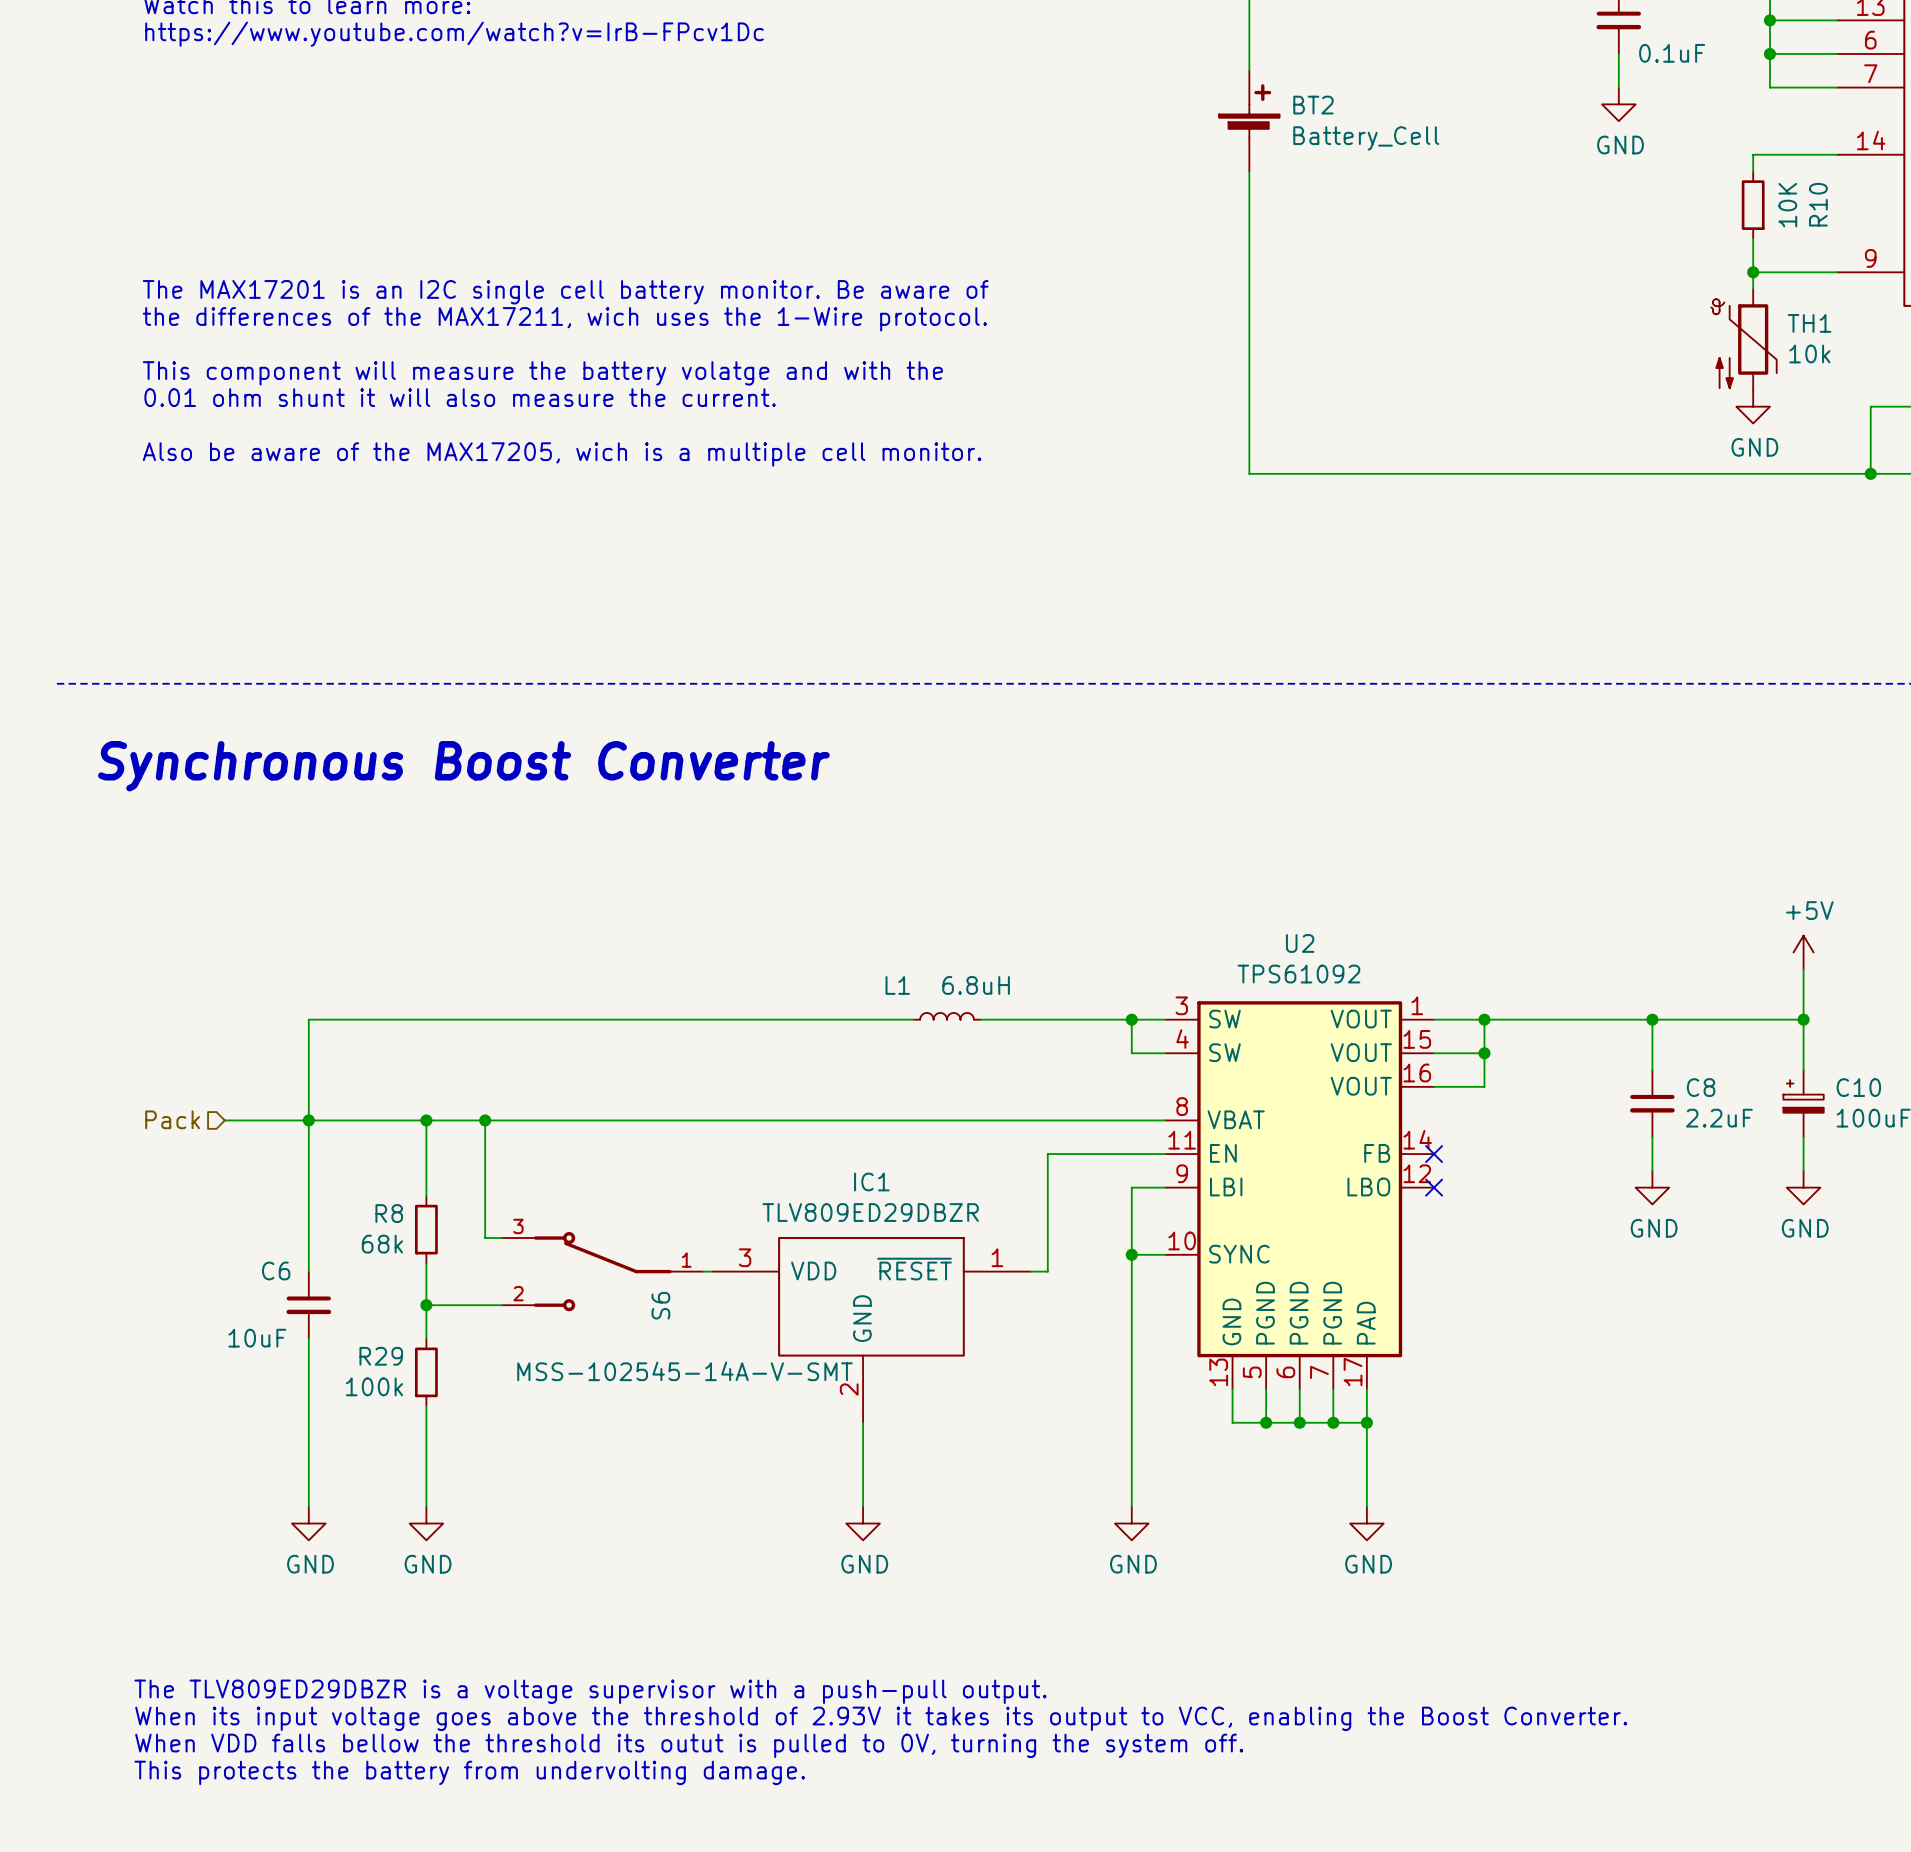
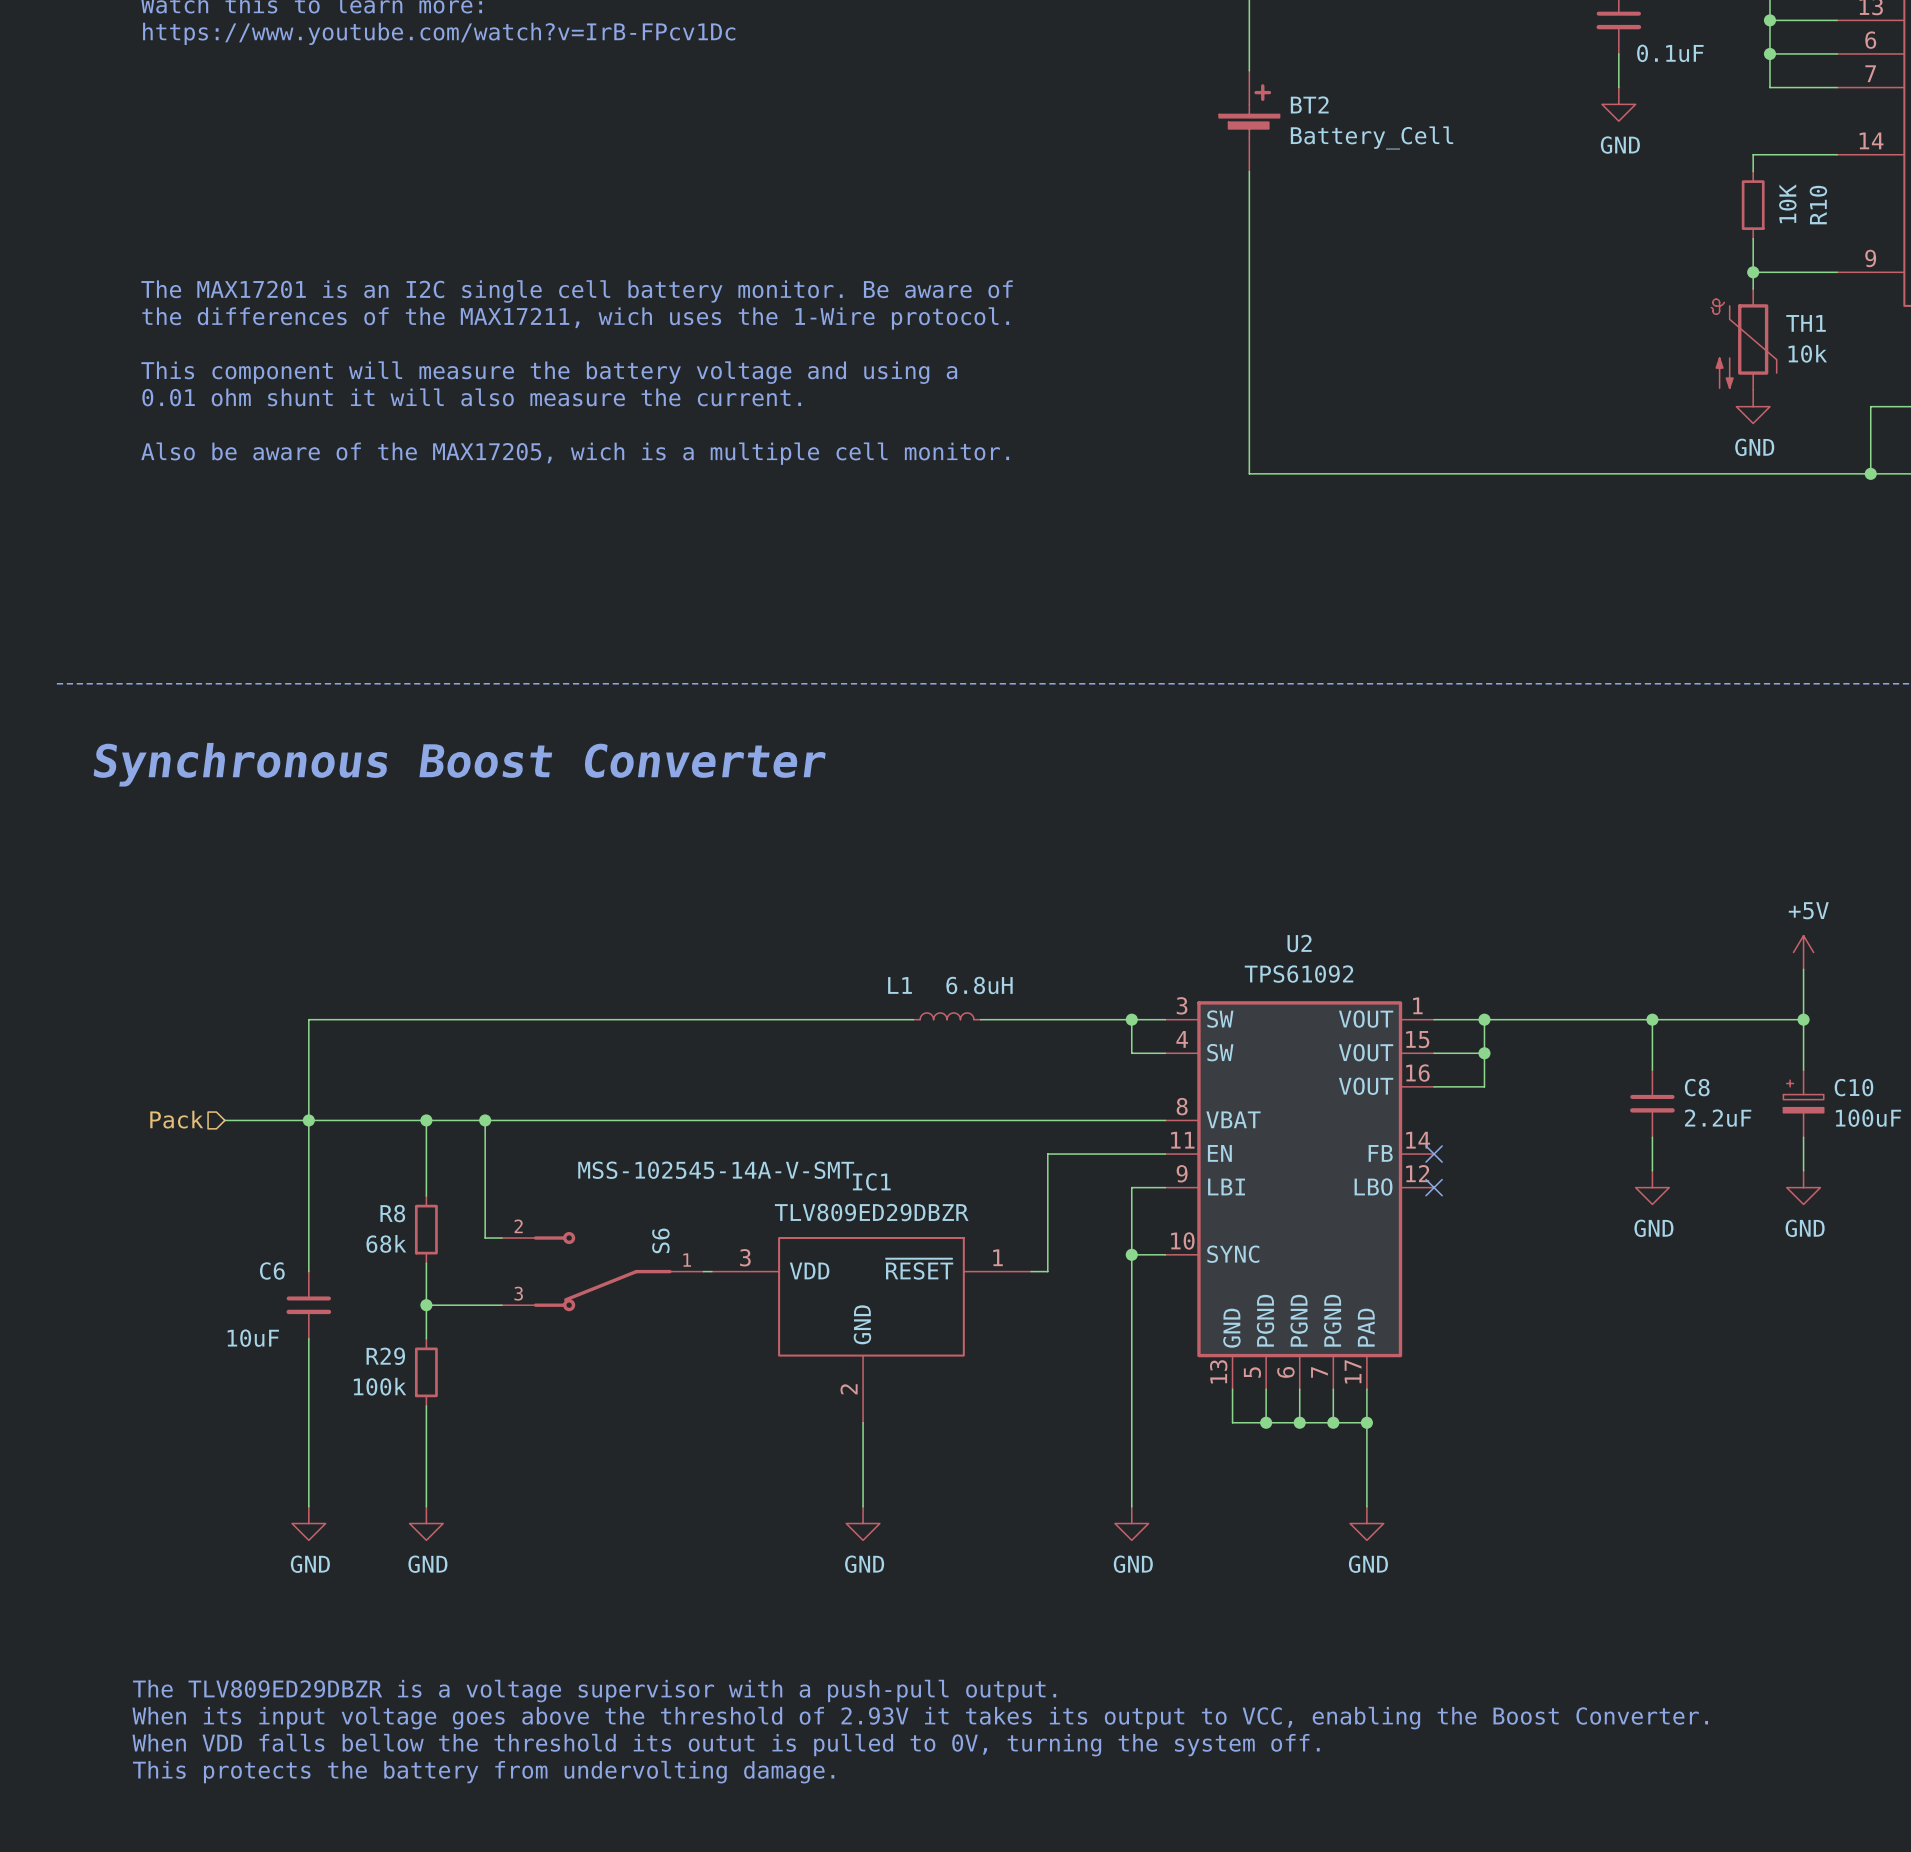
text: This component will measure the battery volatge and with the (542, 373) -> This component will measure the battery voltage and using a (549, 372)
S6 flip: as is (602, 1271) -> up-down (602, 1271)

